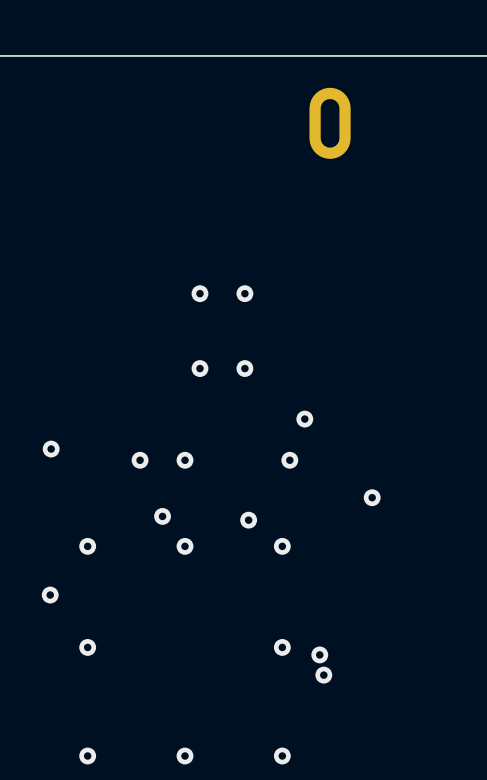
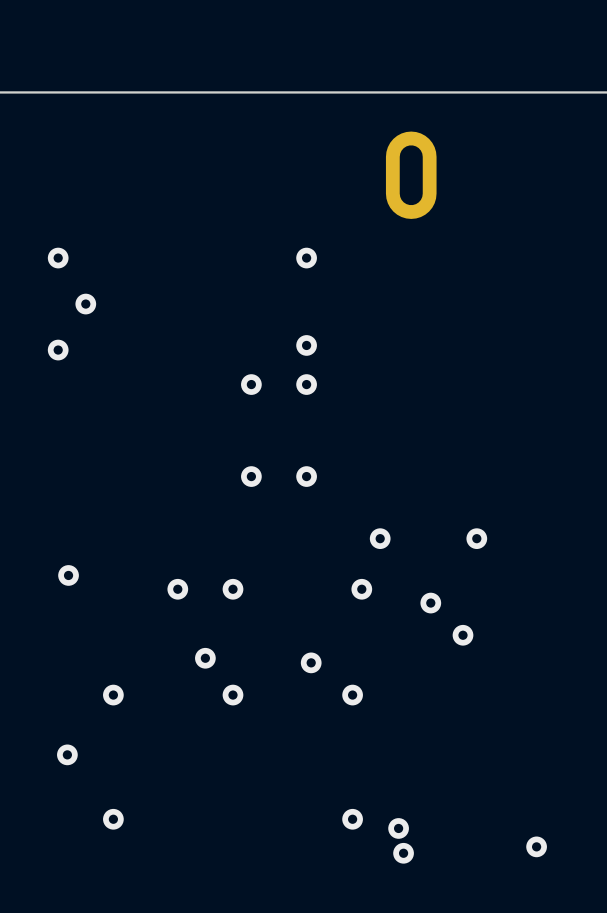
via: none -> (58, 258)
via: none -> (306, 258)
via: none -> (85, 304)
via: none -> (306, 345)
via: none -> (58, 350)
via: none -> (476, 538)
via: none -> (430, 603)
via: none -> (536, 846)

